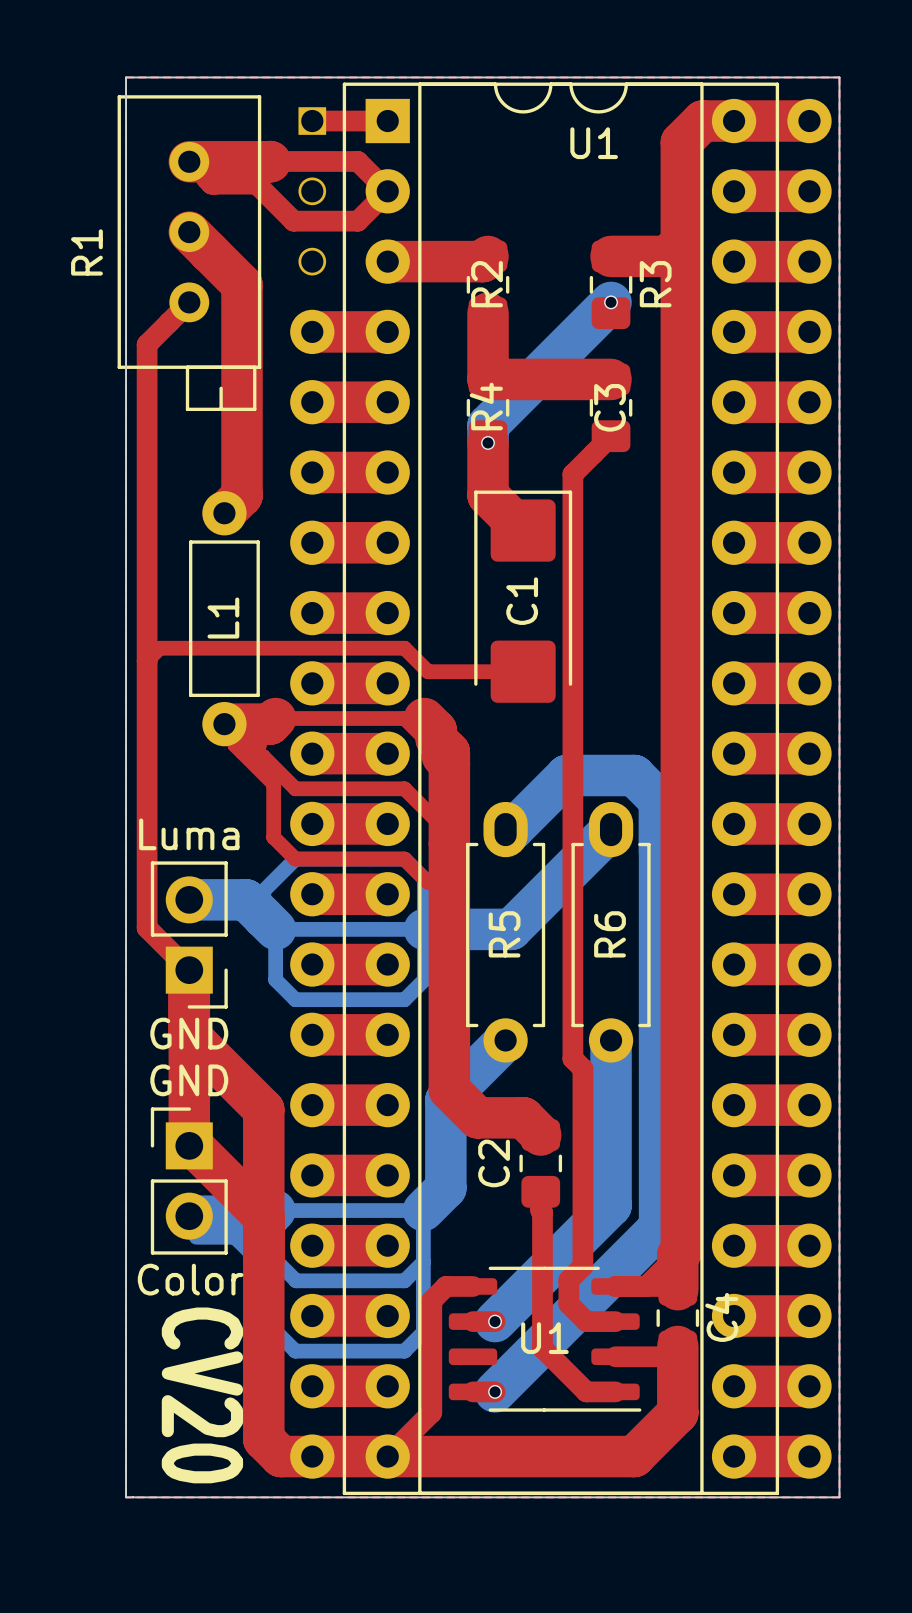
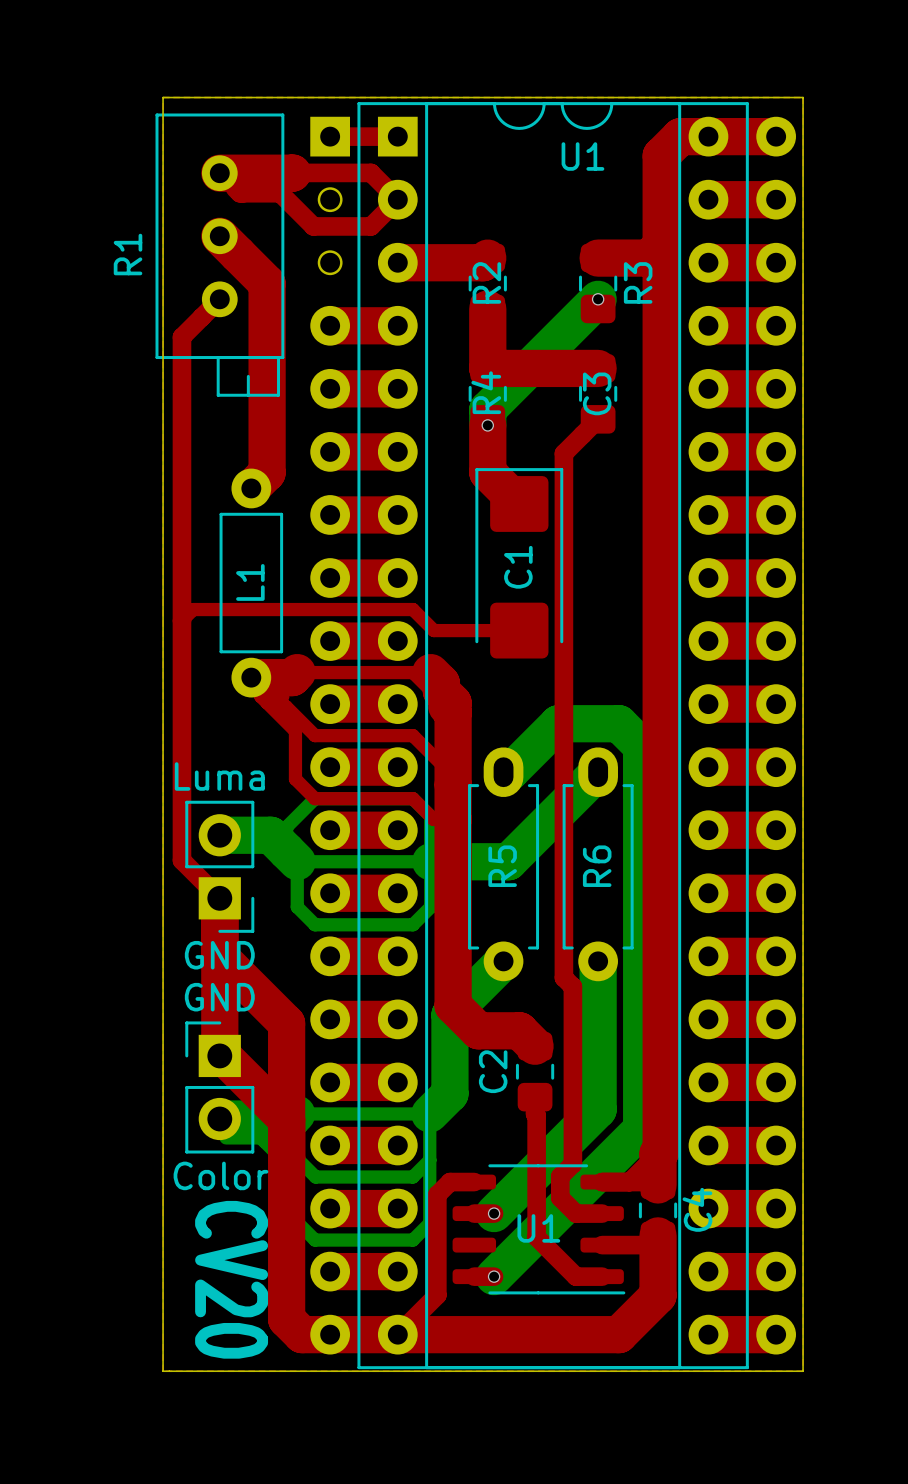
part footprint: [290, 82, 757, 1496] -> [310, 102, 729, 1370]

